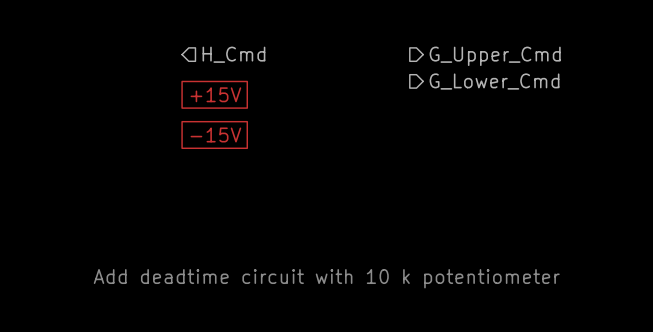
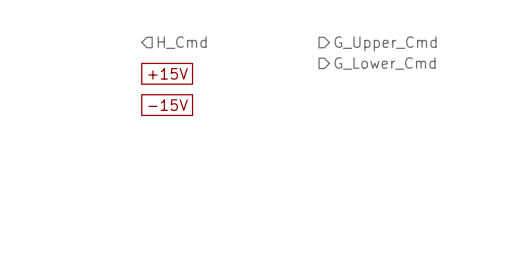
text: Add deadtime circuit with 10 k potentiometer (326, 278) -> none

